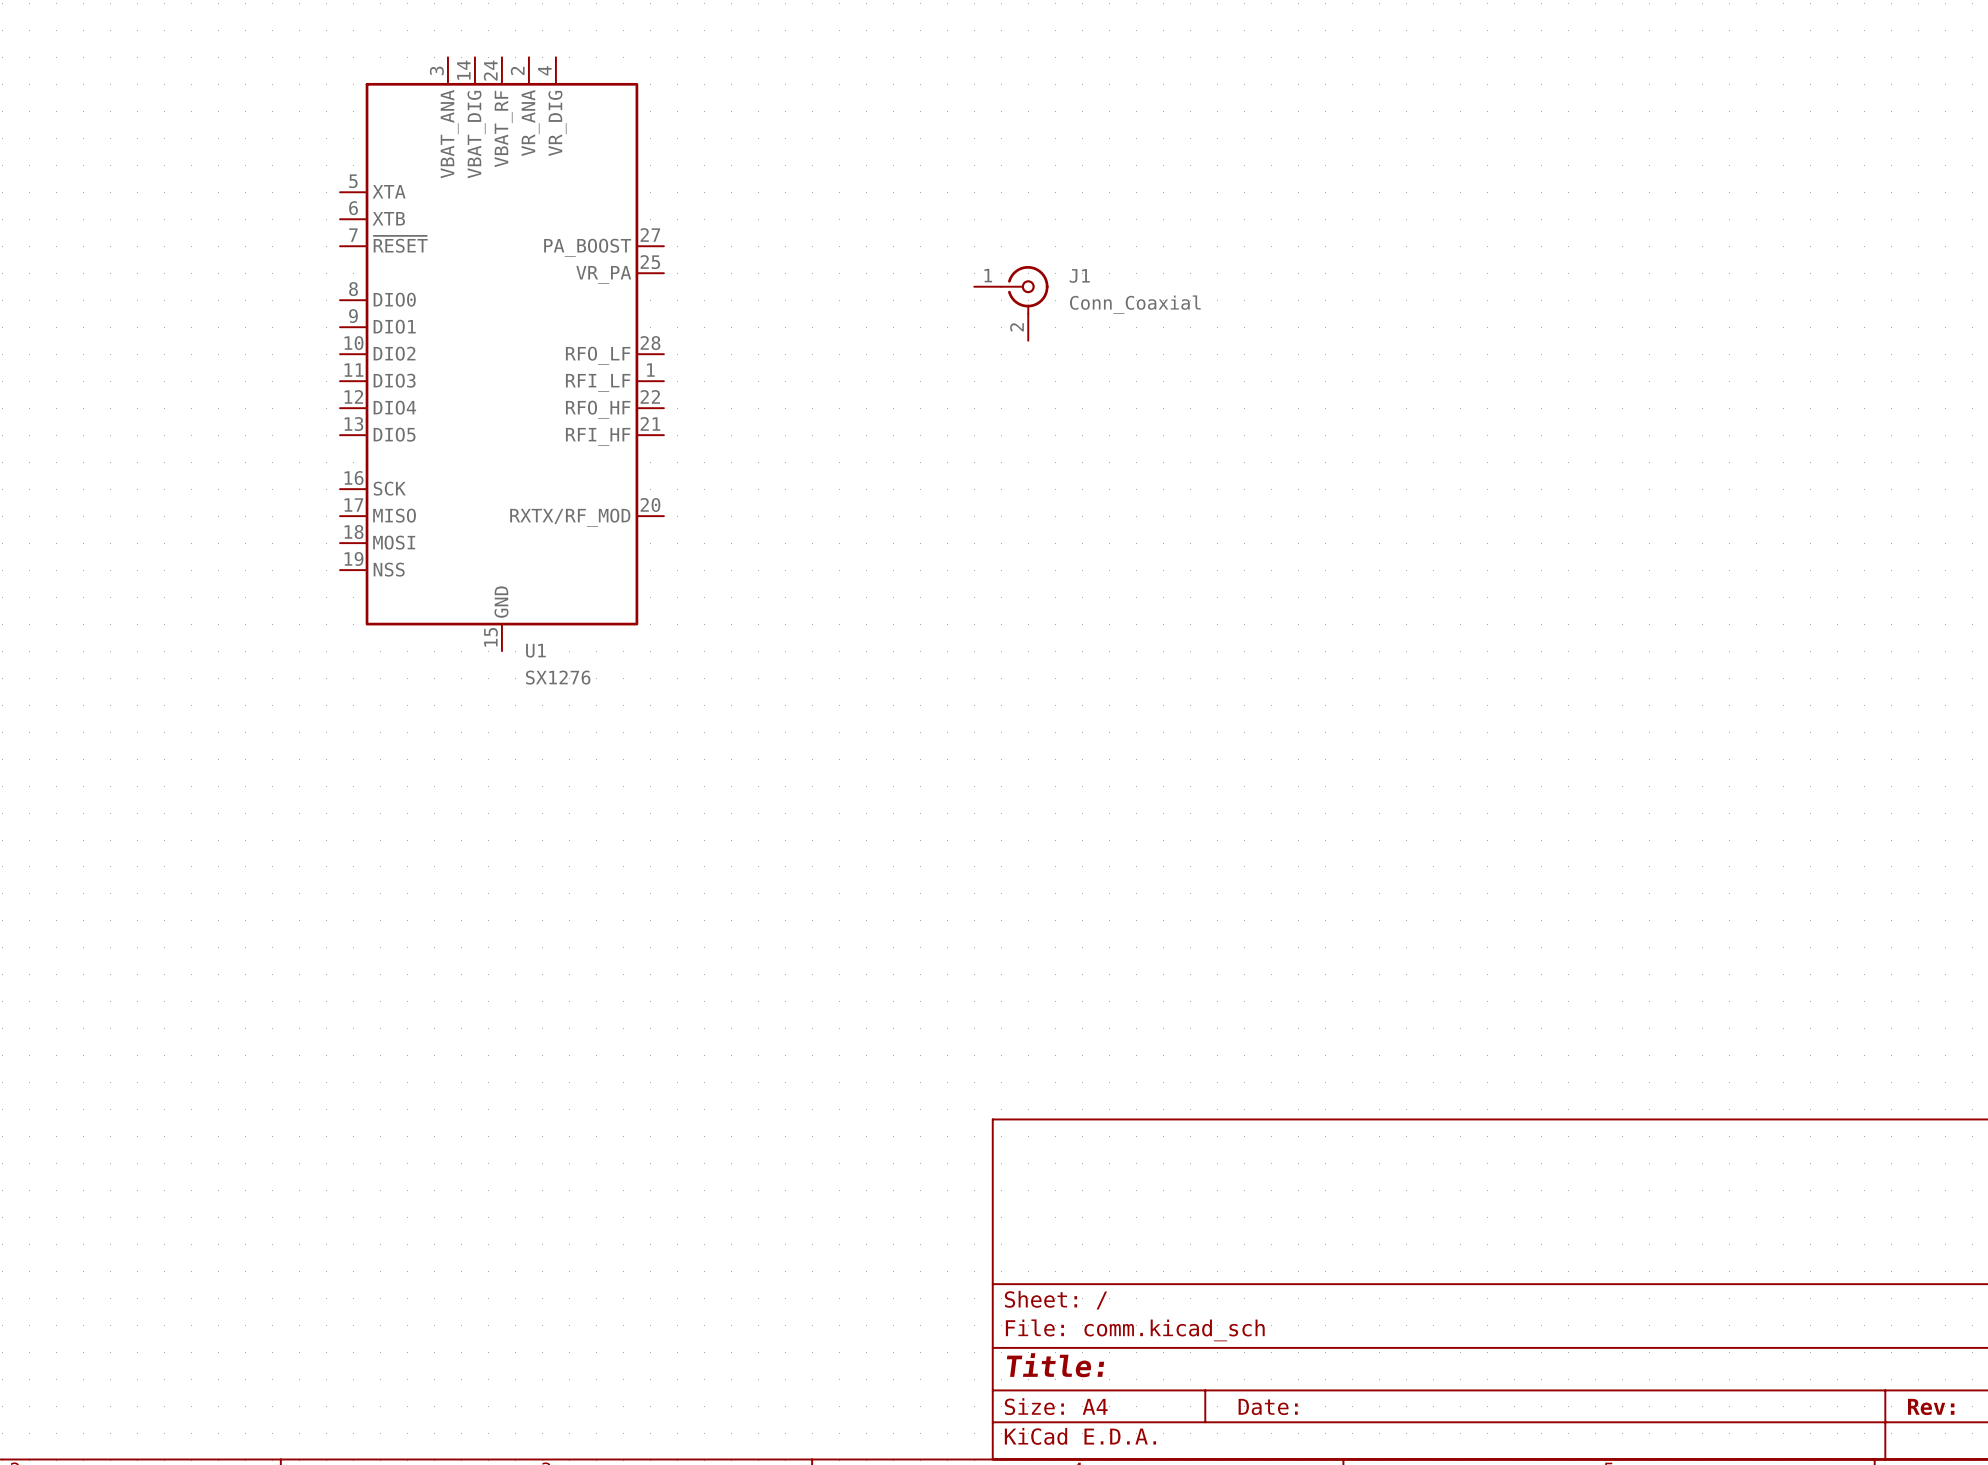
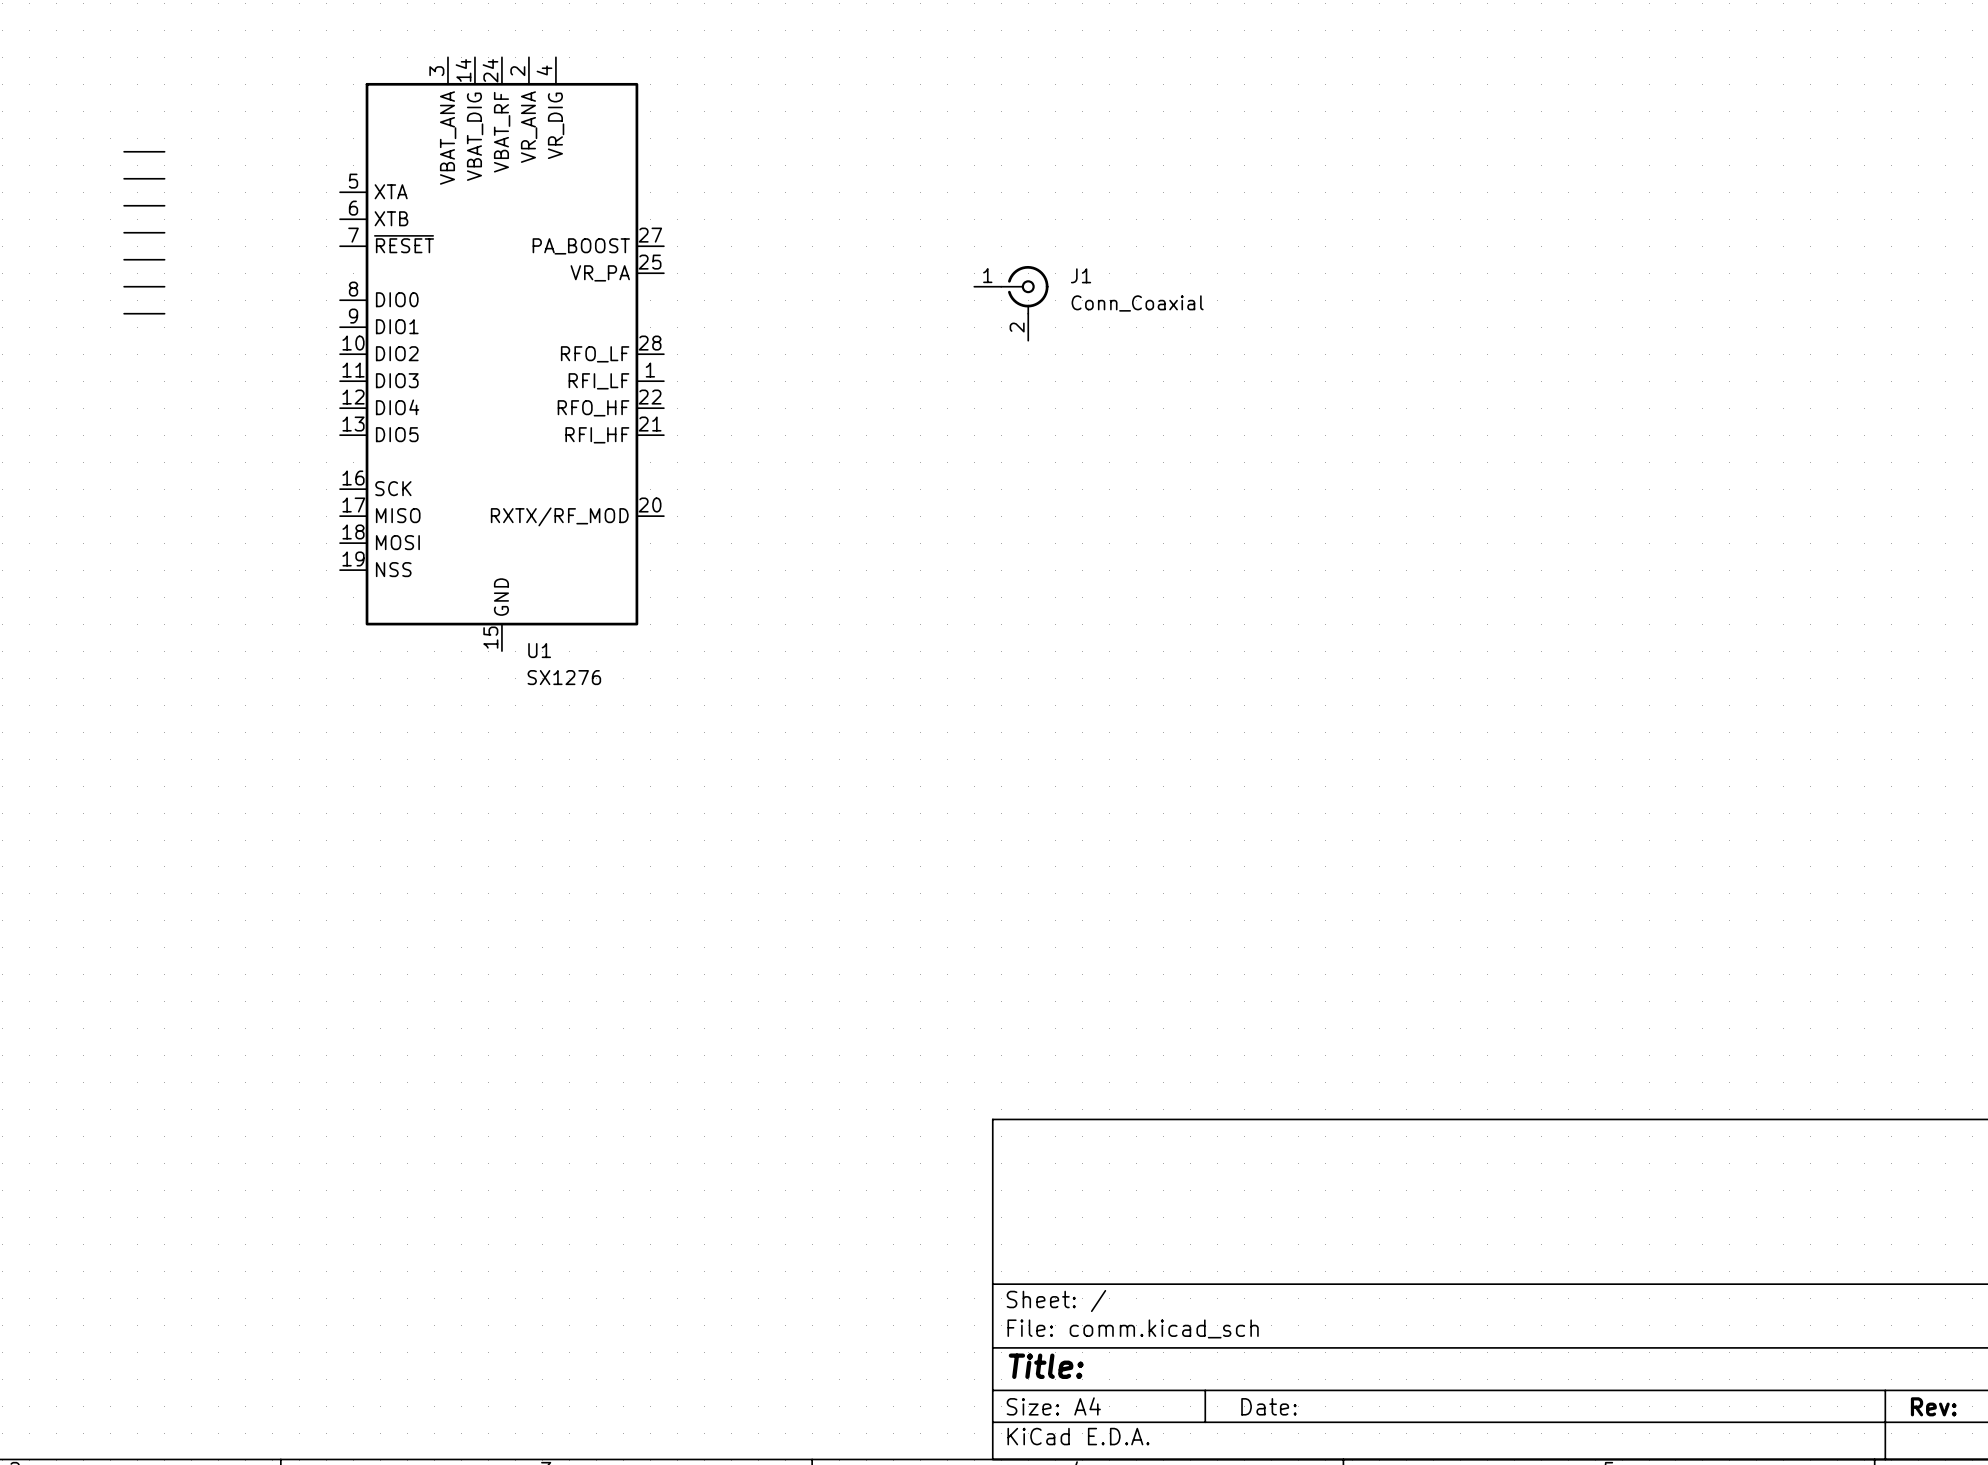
wire: none -> (124, 151) (164, 151)
wire: none -> (124, 178) (164, 178)
wire: none -> (124, 205) (164, 205)
wire: none -> (124, 232) (164, 232)
wire: none -> (124, 259) (164, 259)
wire: none -> (124, 286) (164, 286)
wire: none -> (124, 313) (164, 313)

